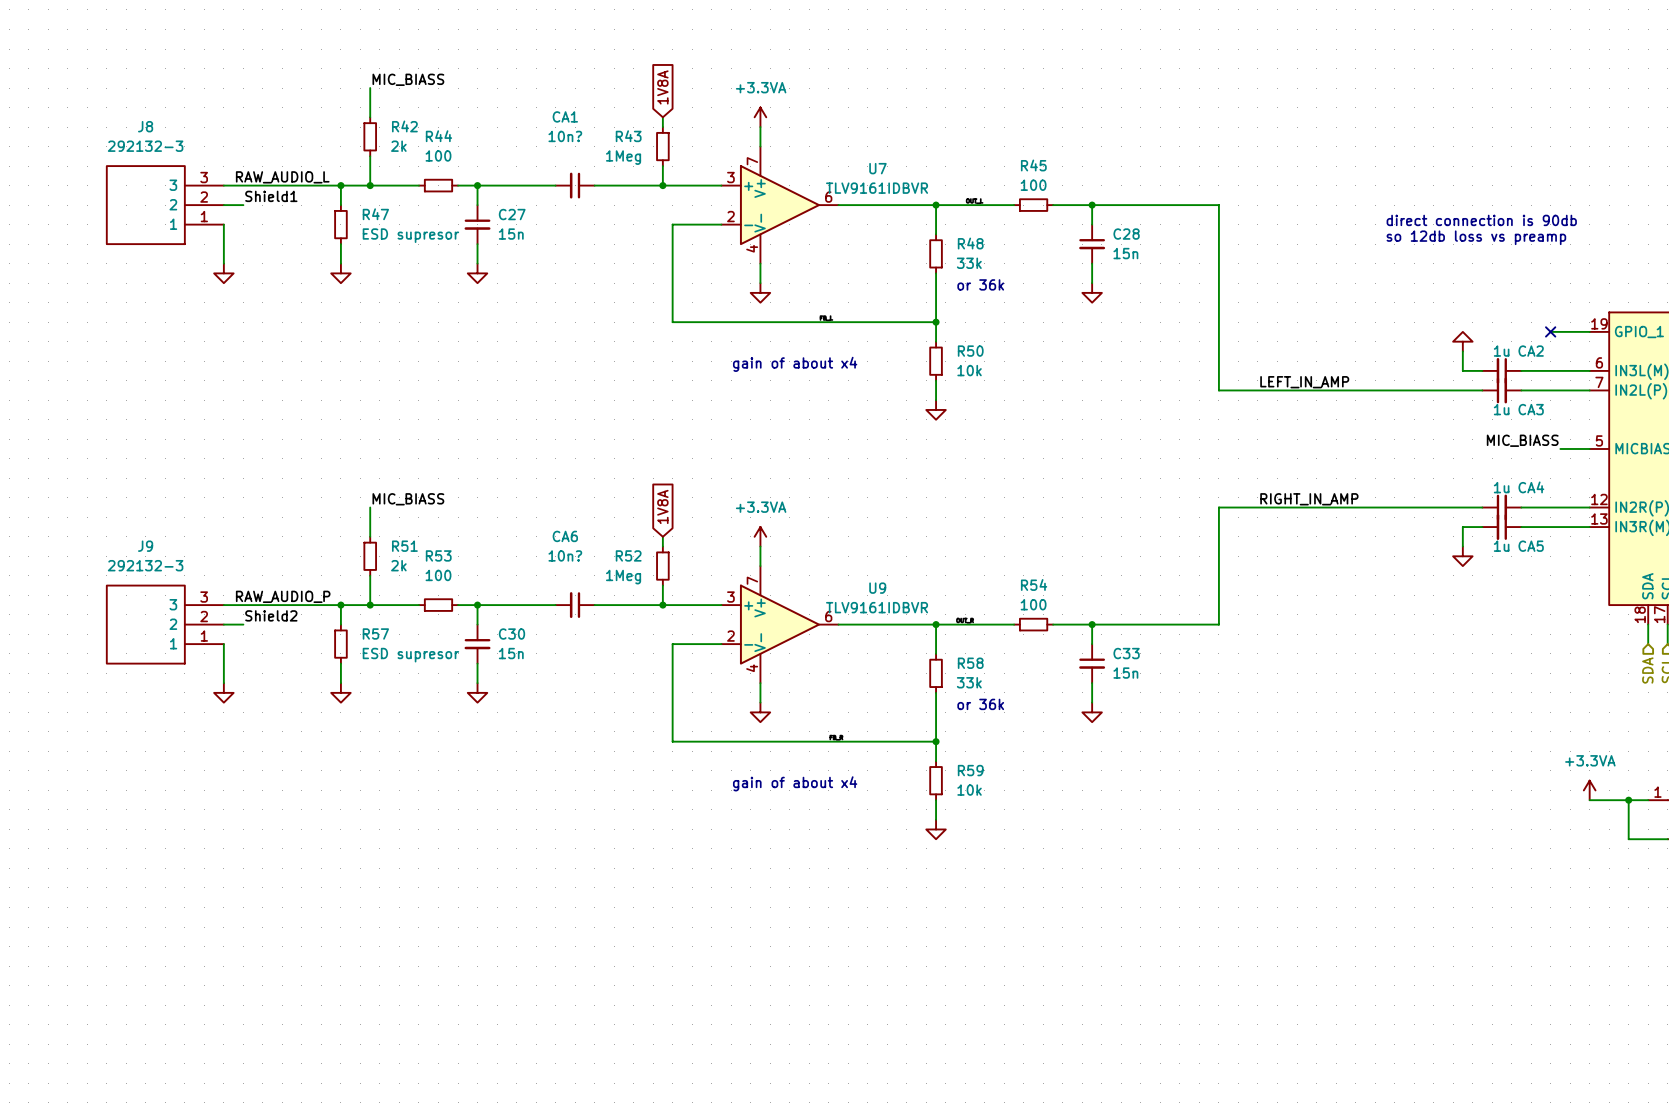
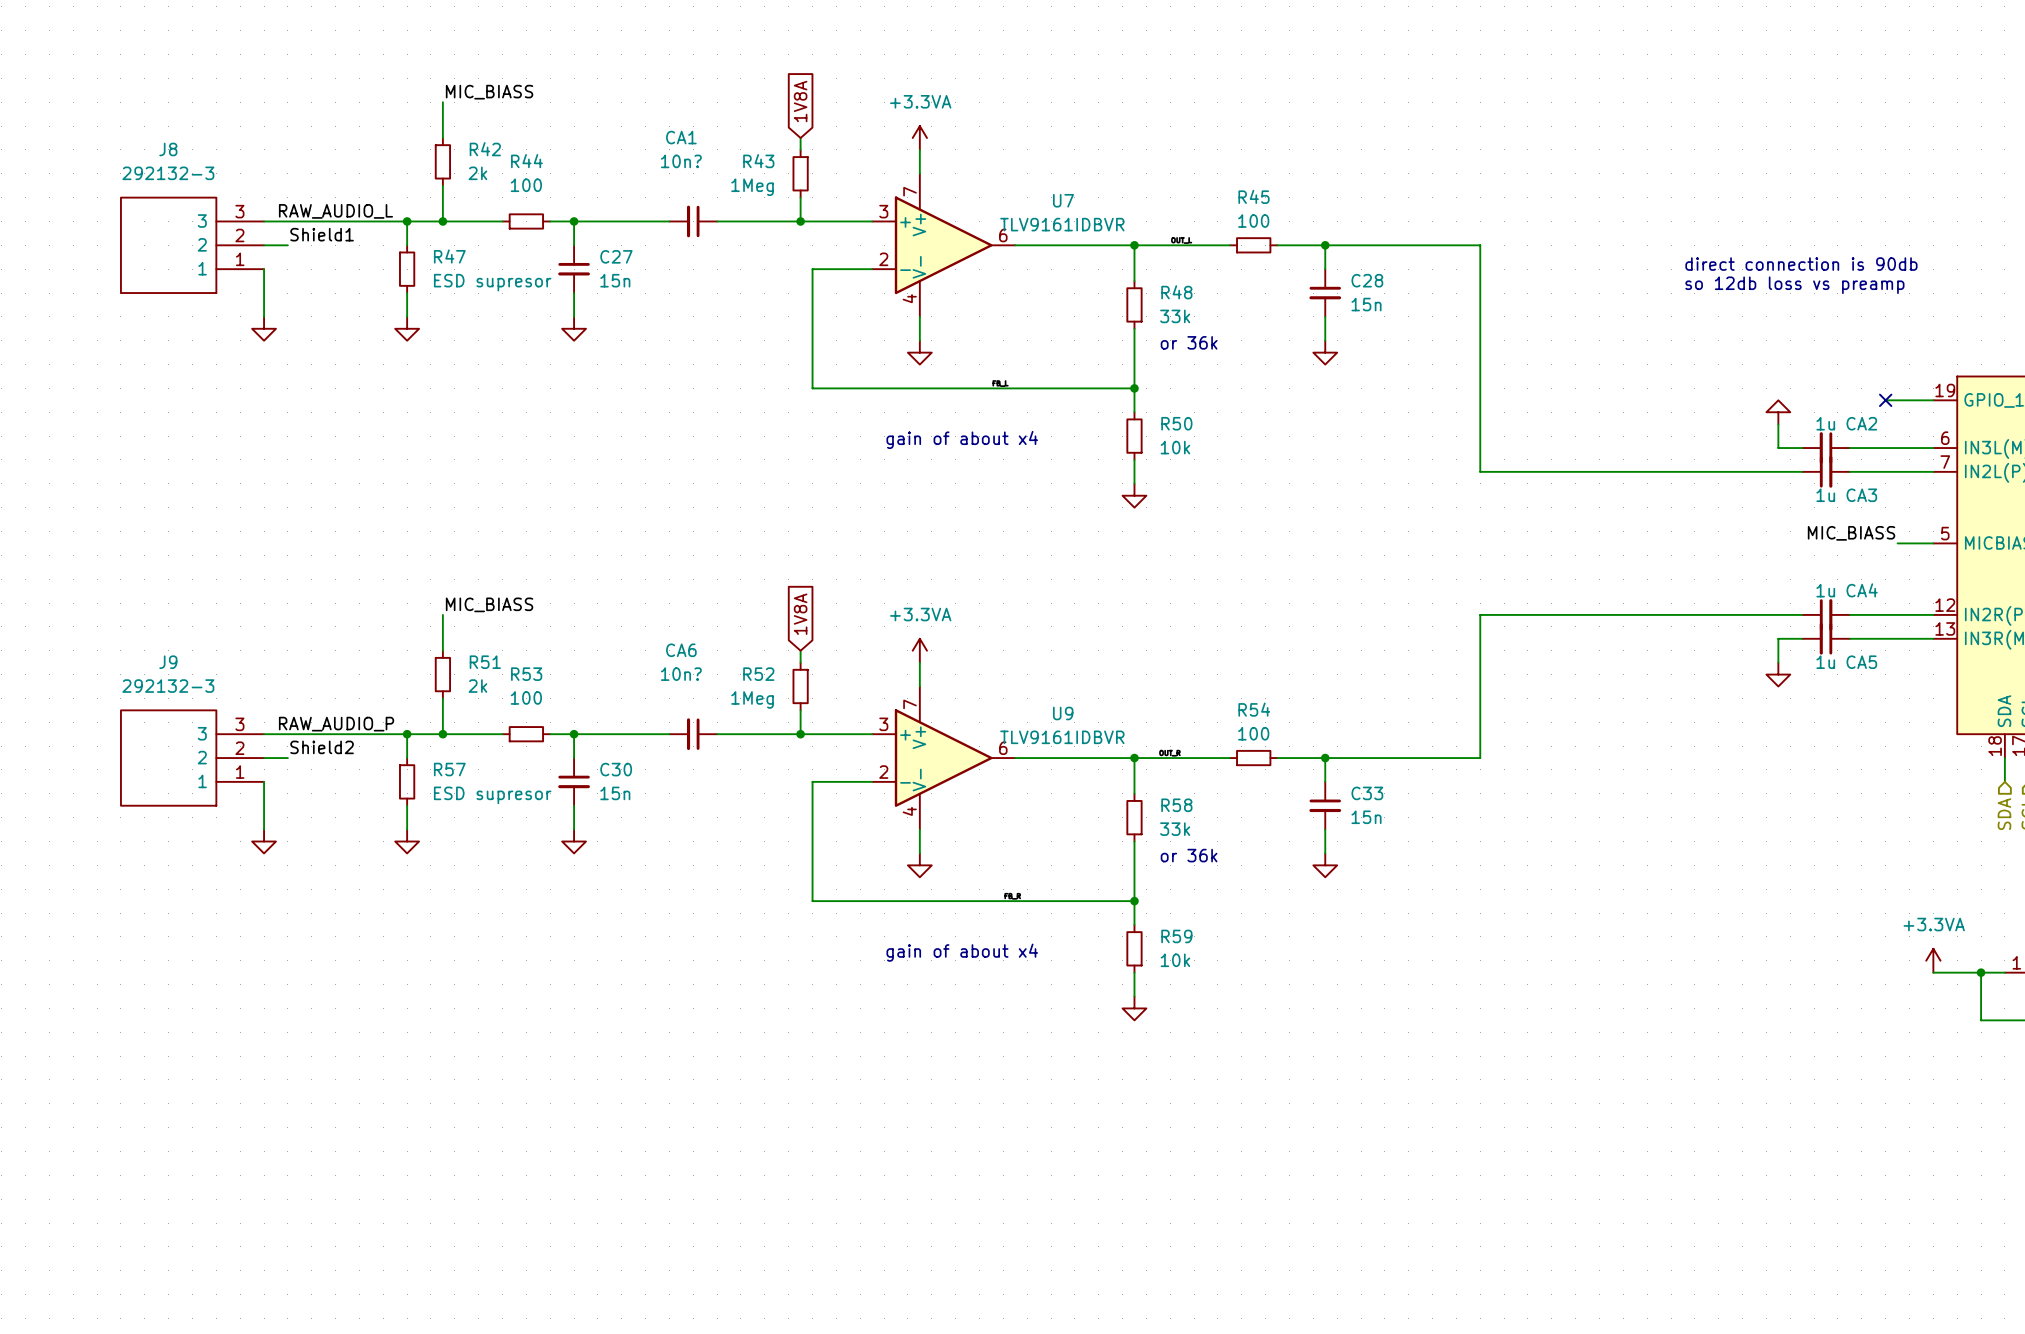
label: LEFT_IN_AMP (1304, 382) -> none
label: RIGHT_IN_AMP (1309, 499) -> none

